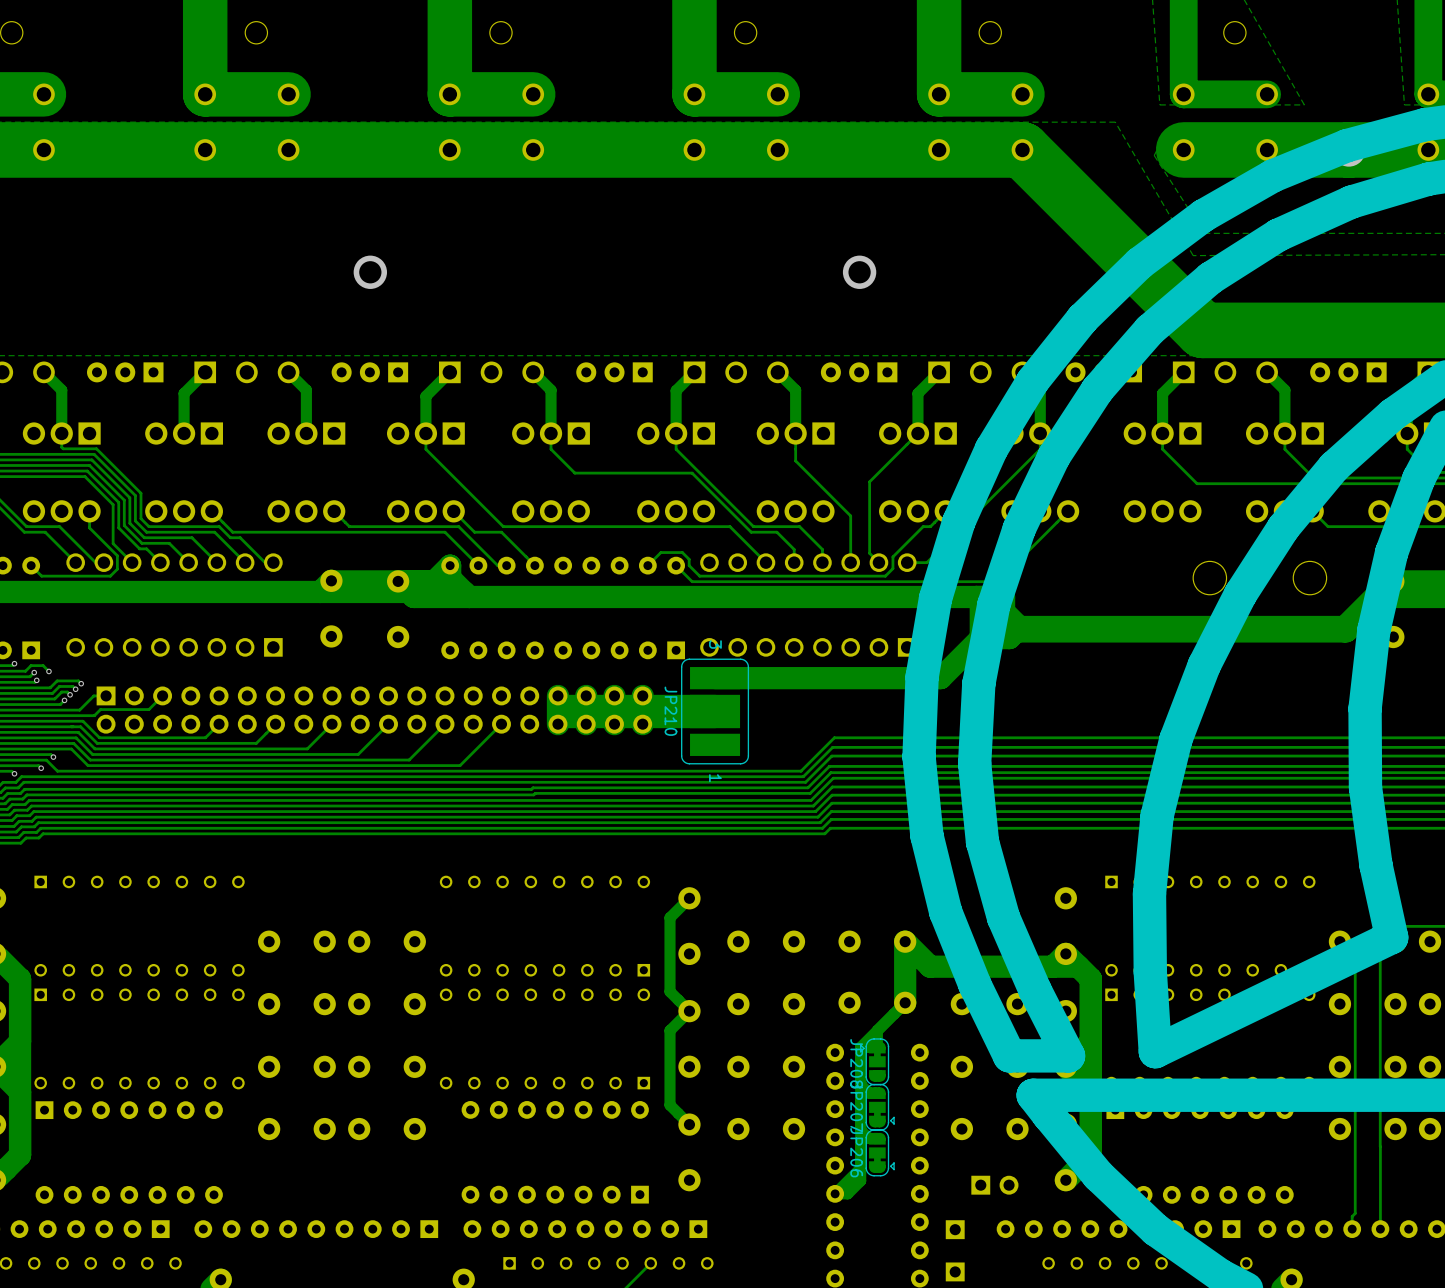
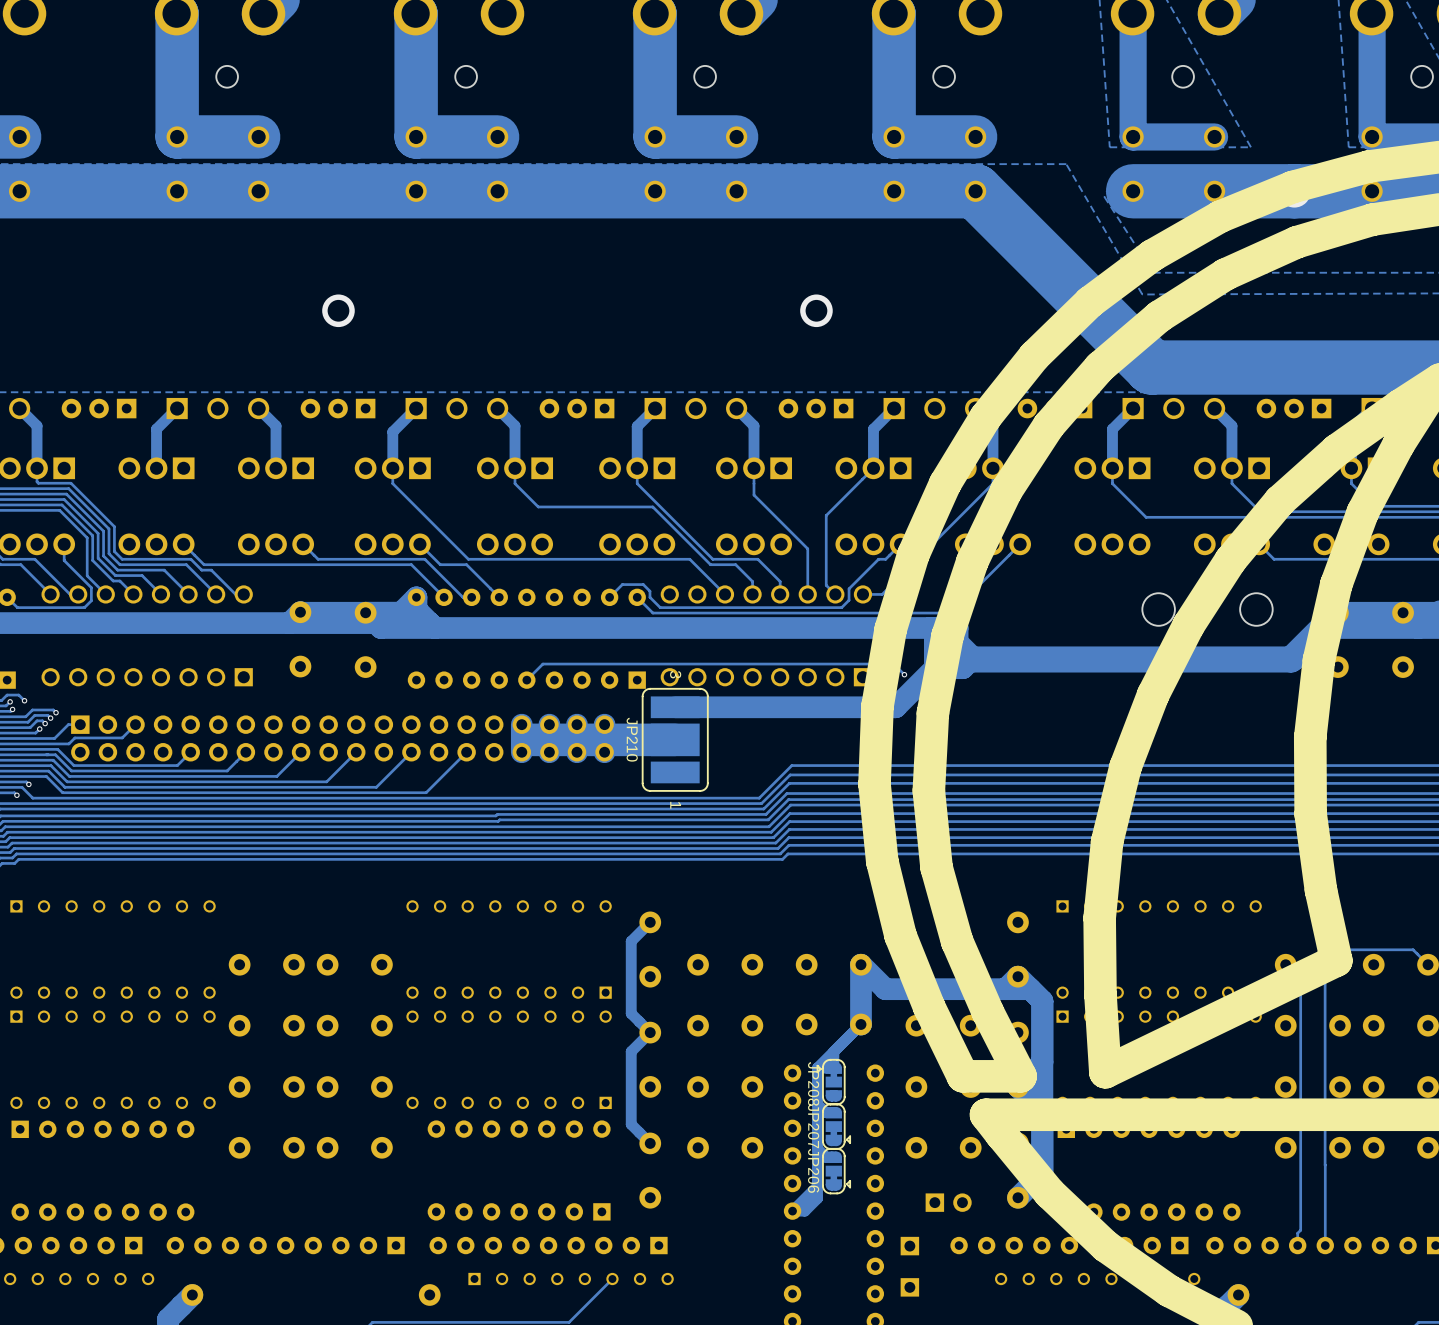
track: none -> (904, 674) (893, 664) (542, 664) (526, 680)
via: none -> (904, 674)

